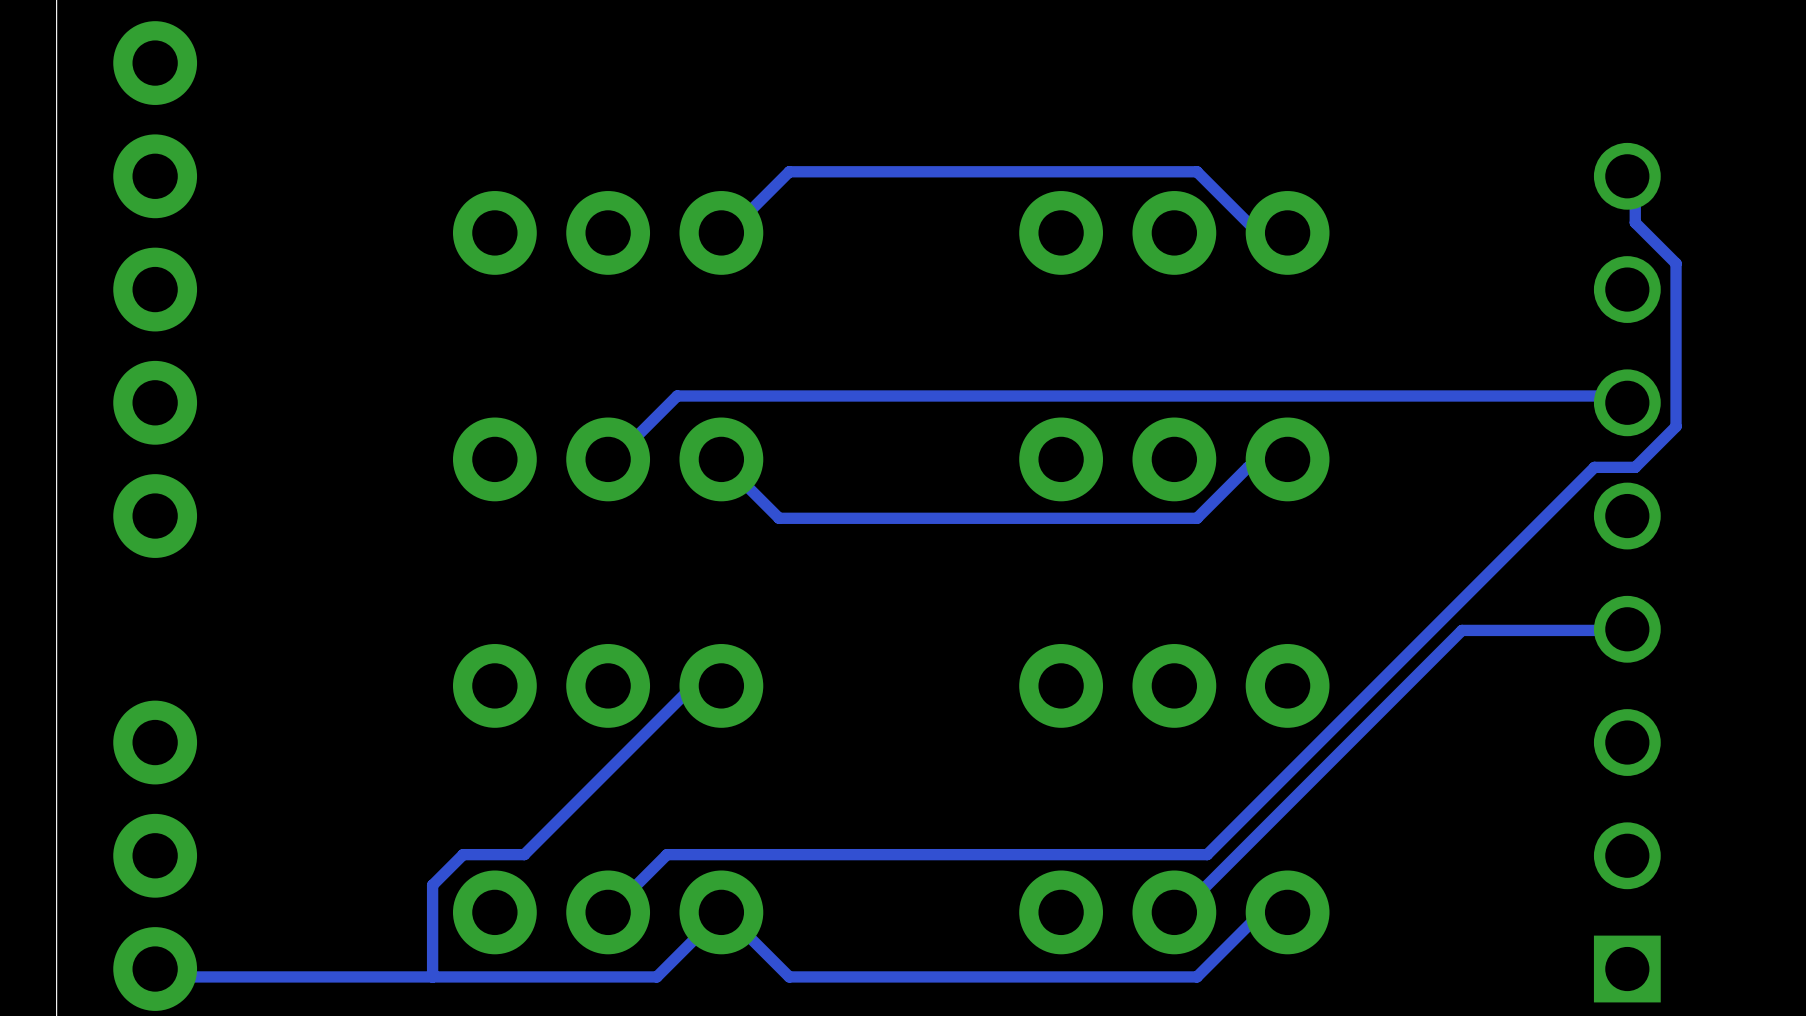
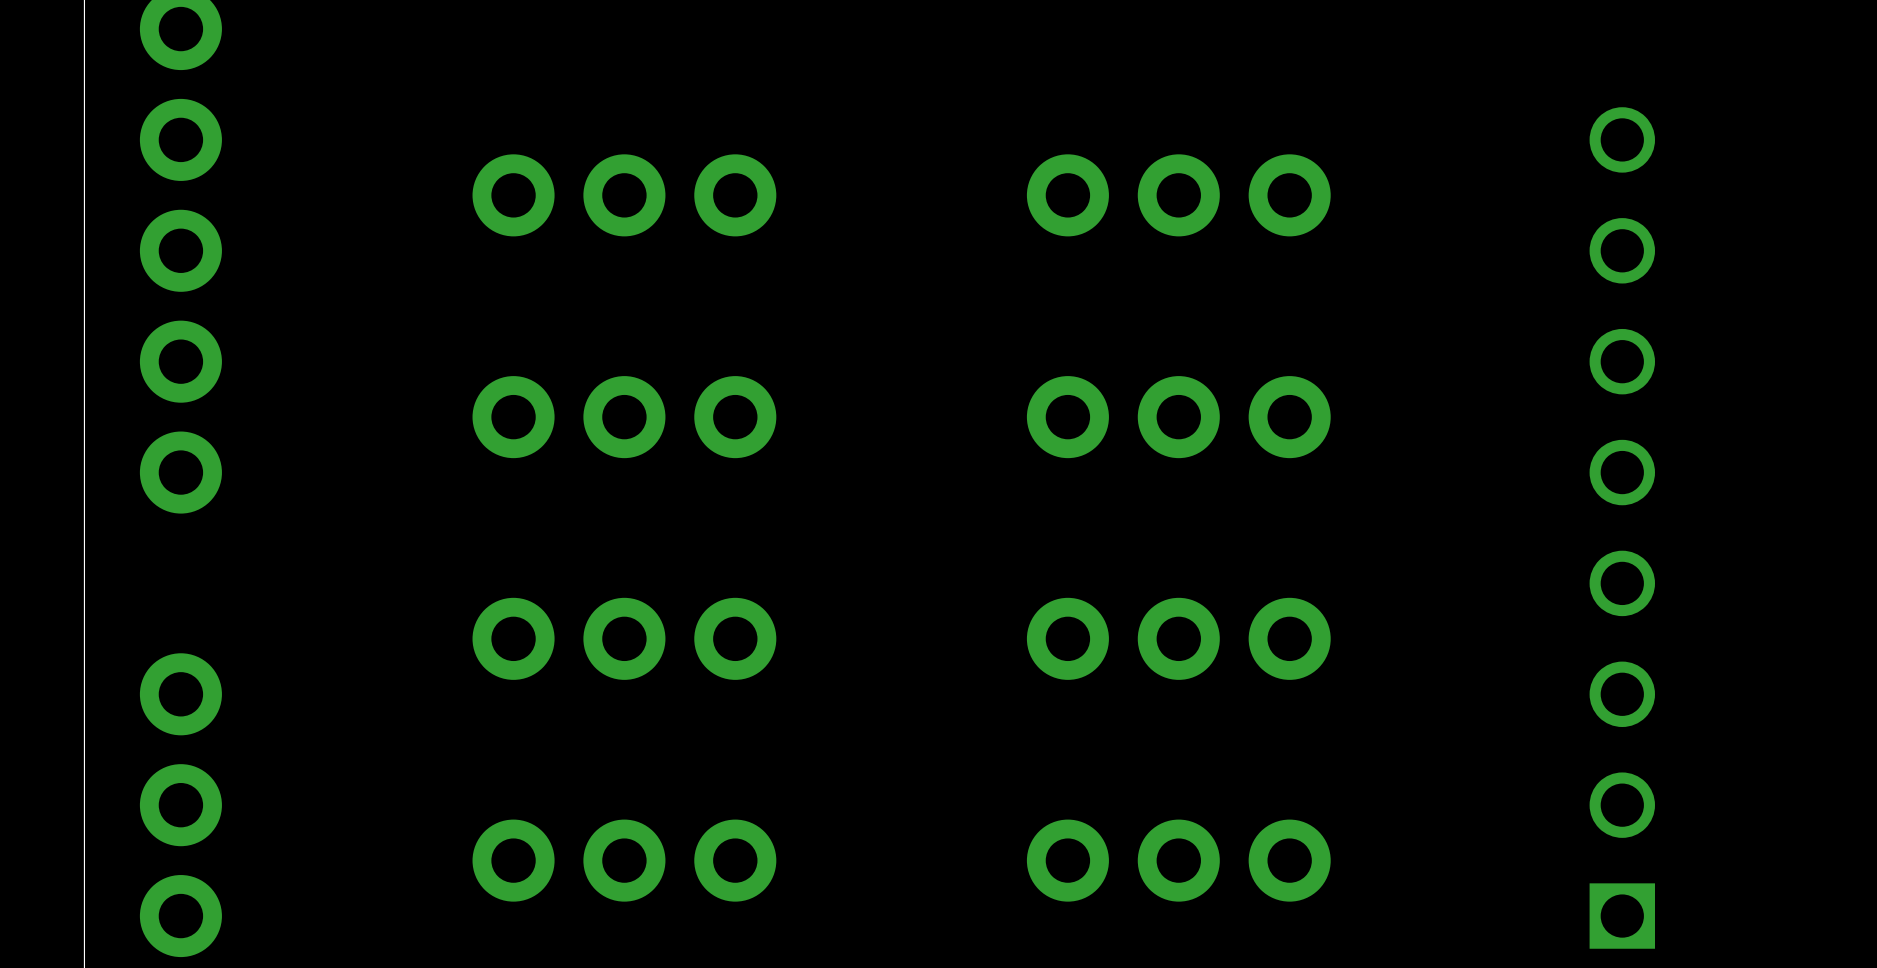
track: (1627, 176) (1635, 181) (1635, 222) (1676, 263) (1676, 426) (1635, 467) (1594, 467) (1207, 854) (667, 854) (608, 912) -> none
track: (1287, 232) (1258, 232) (1197, 171) (789, 171) (728, 232) (721, 232) -> none
track: (1627, 402) (1625, 396) (677, 396) (616, 457) (608, 459) -> none
track: (1287, 459) (1278, 467) (1247, 467) (1197, 518) (779, 518) (721, 459) -> none
track: (1627, 629) (1462, 630) (1176, 915) (1174, 912) -> none
track: (721, 685) (717, 691) (687, 691) (524, 854) (463, 854) (432, 885) (432, 976) -> none
track: (1287, 912) (1278, 915) (1258, 915) (1197, 976) (789, 976) (728, 915) (721, 912) (656, 976) (157, 976) (155, 969) -> none

